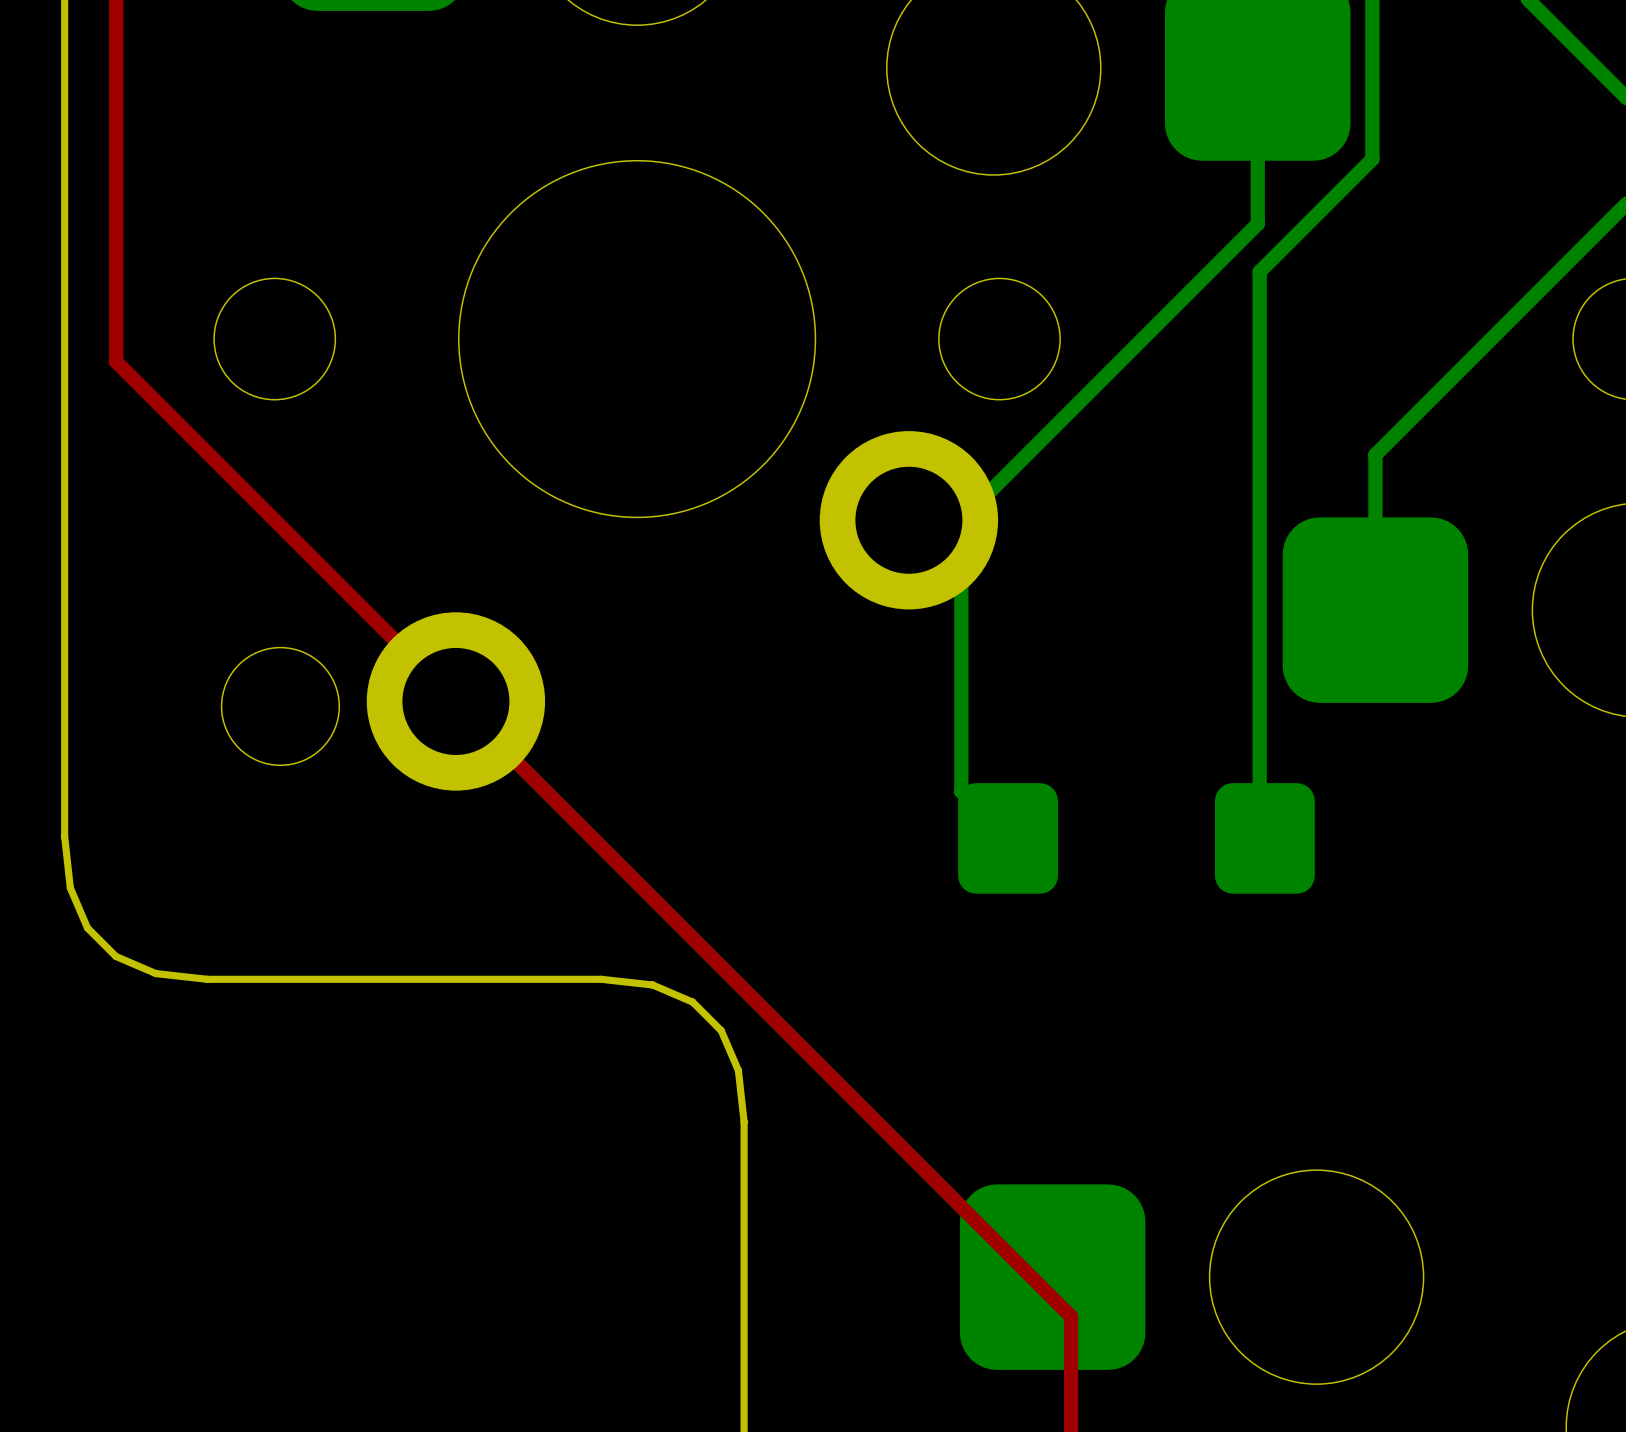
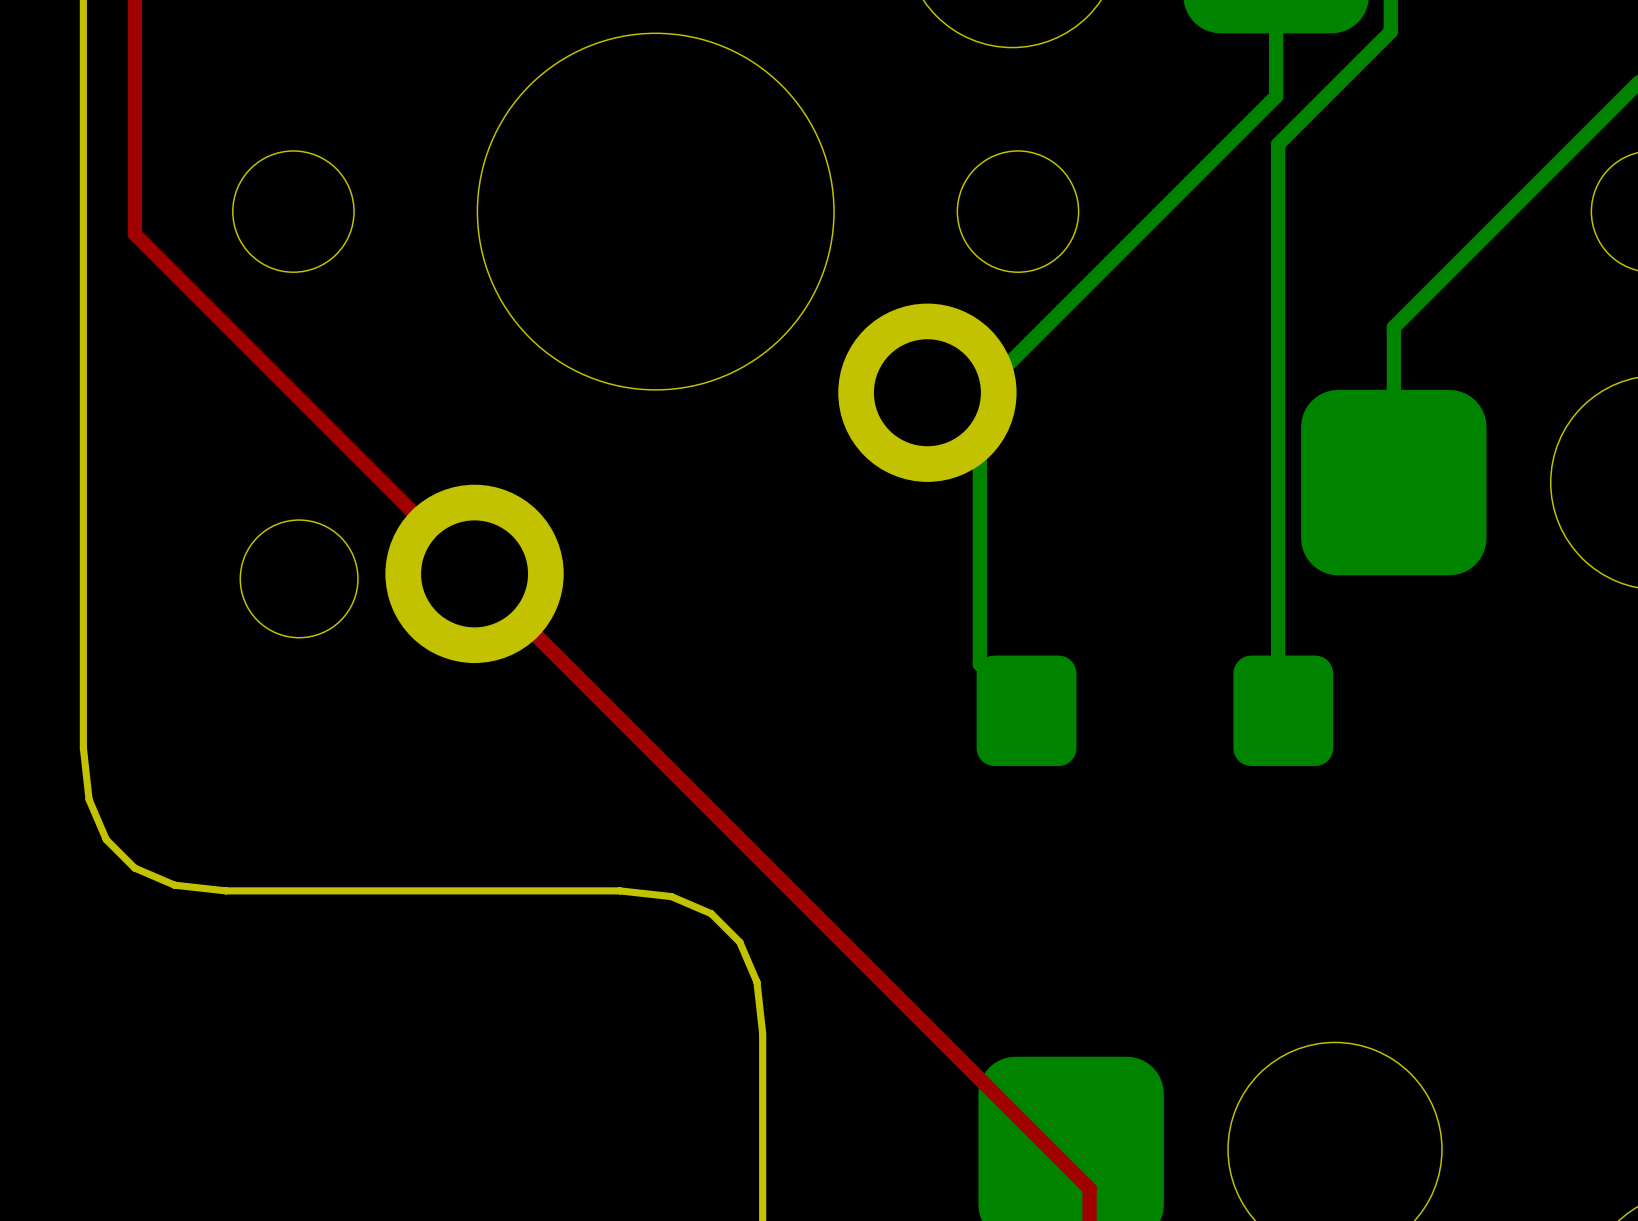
board edge: (64, 836) (70, 888) (87, 927) (116, 956) (155, 973) (207, 979) (601, 979) (652, 985) (692, 1002) (721, 1030) (738, 1070) (744, 1121) (744, 1161) -> (83, 709) (83, 748) (89, 799) (106, 839) (134, 868) (174, 885) (226, 890) (620, 890) (671, 896) (711, 913) (739, 942) (756, 982) (762, 1033)

